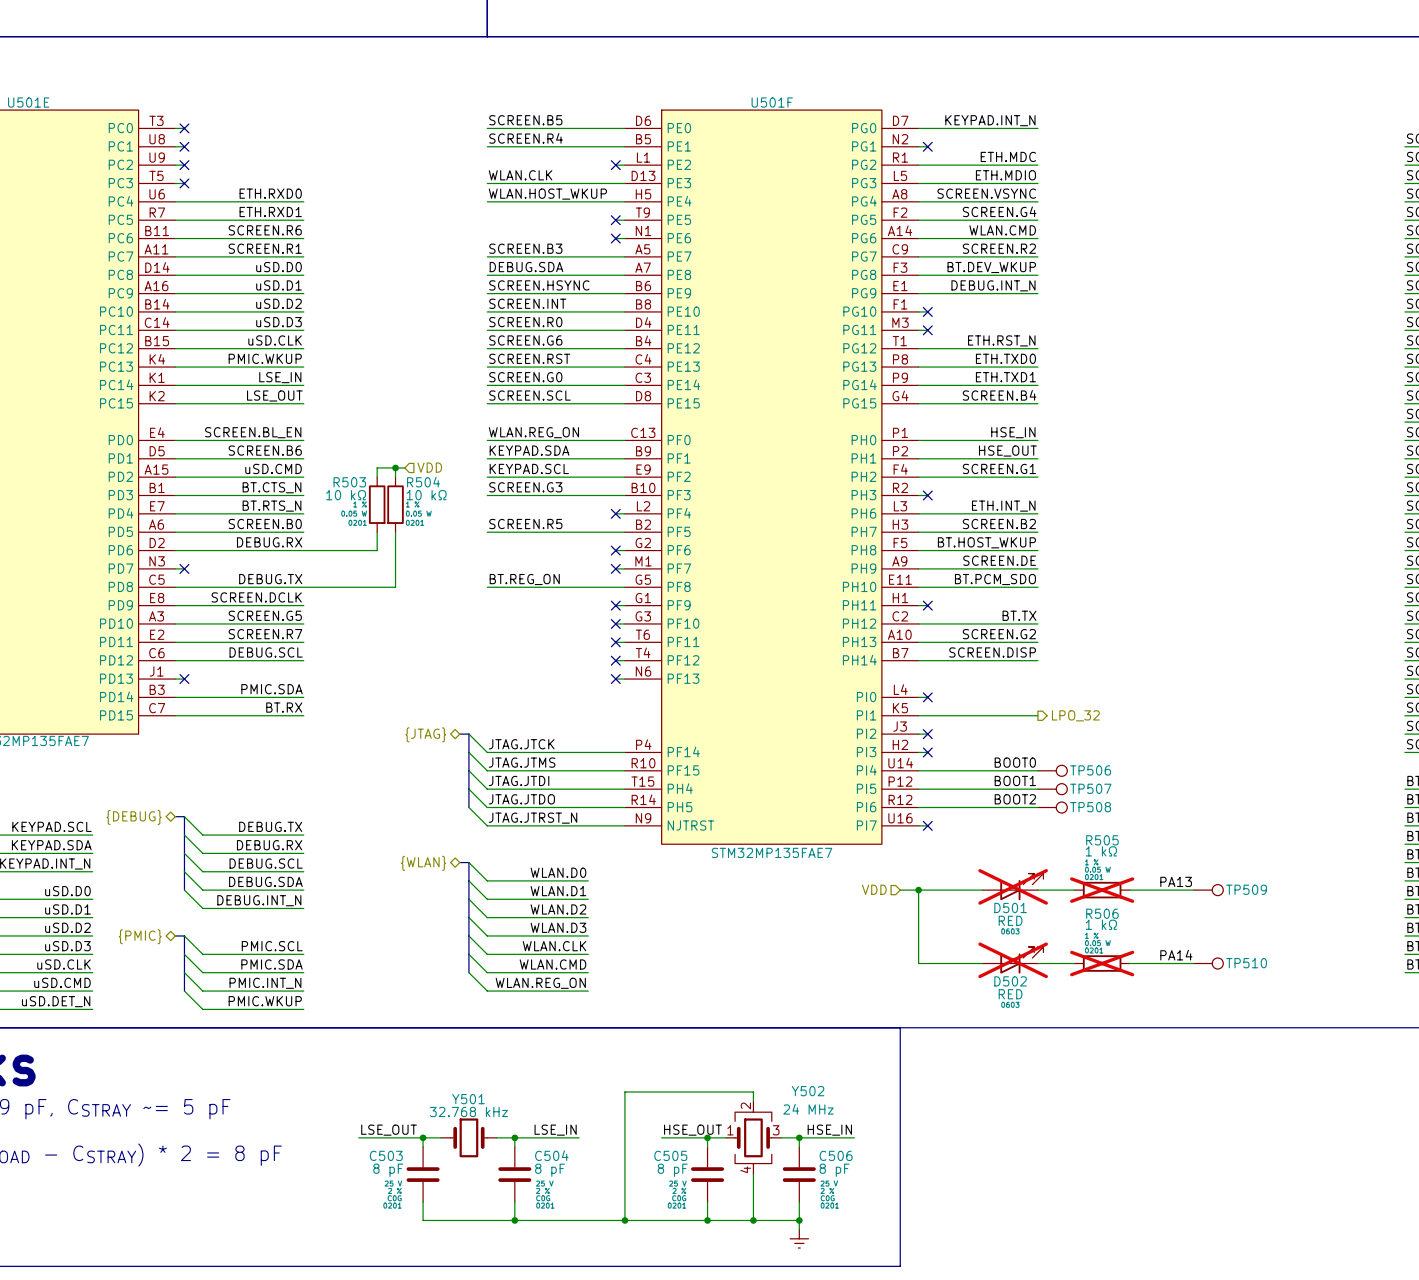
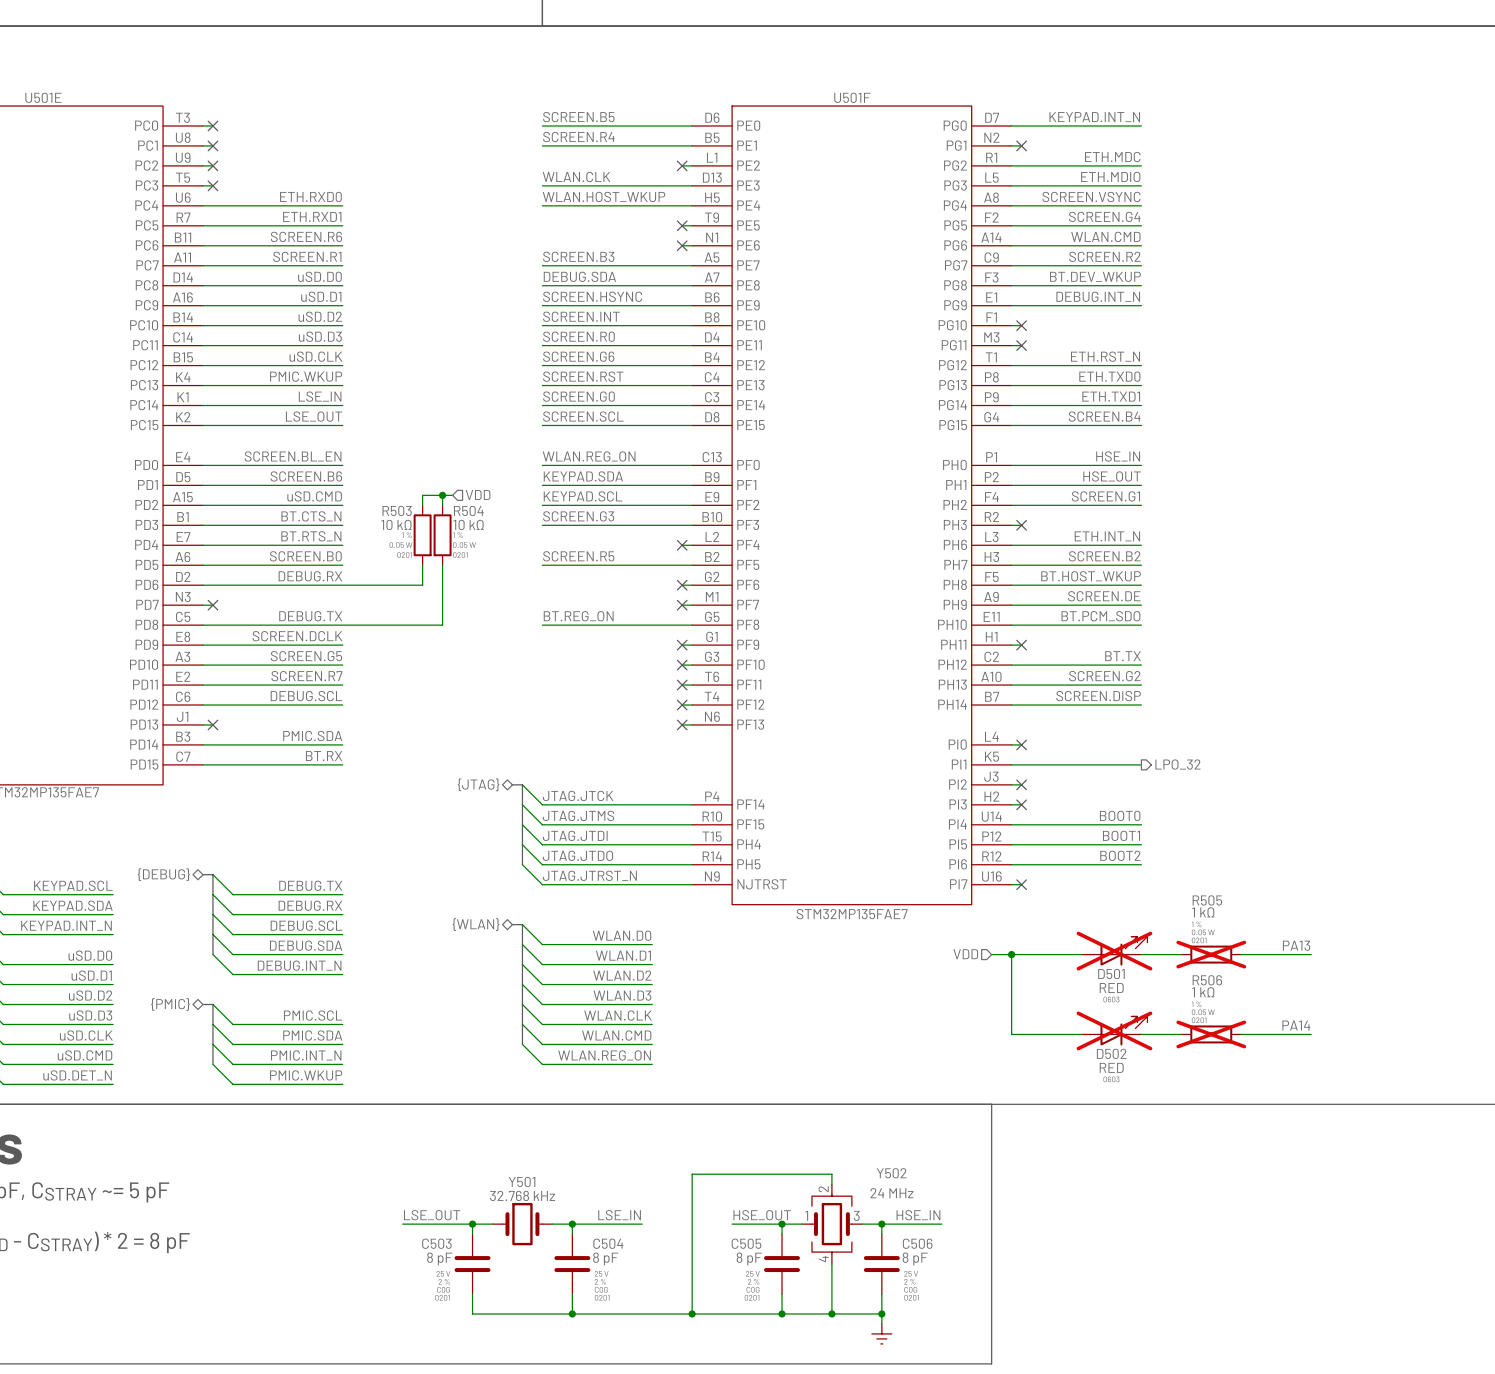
TP506: (1052, 770) -> none
TP507: (1052, 789) -> none
TP508: (1052, 807) -> none
TP509: (1208, 890) -> none
TP510: (1208, 963) -> none

